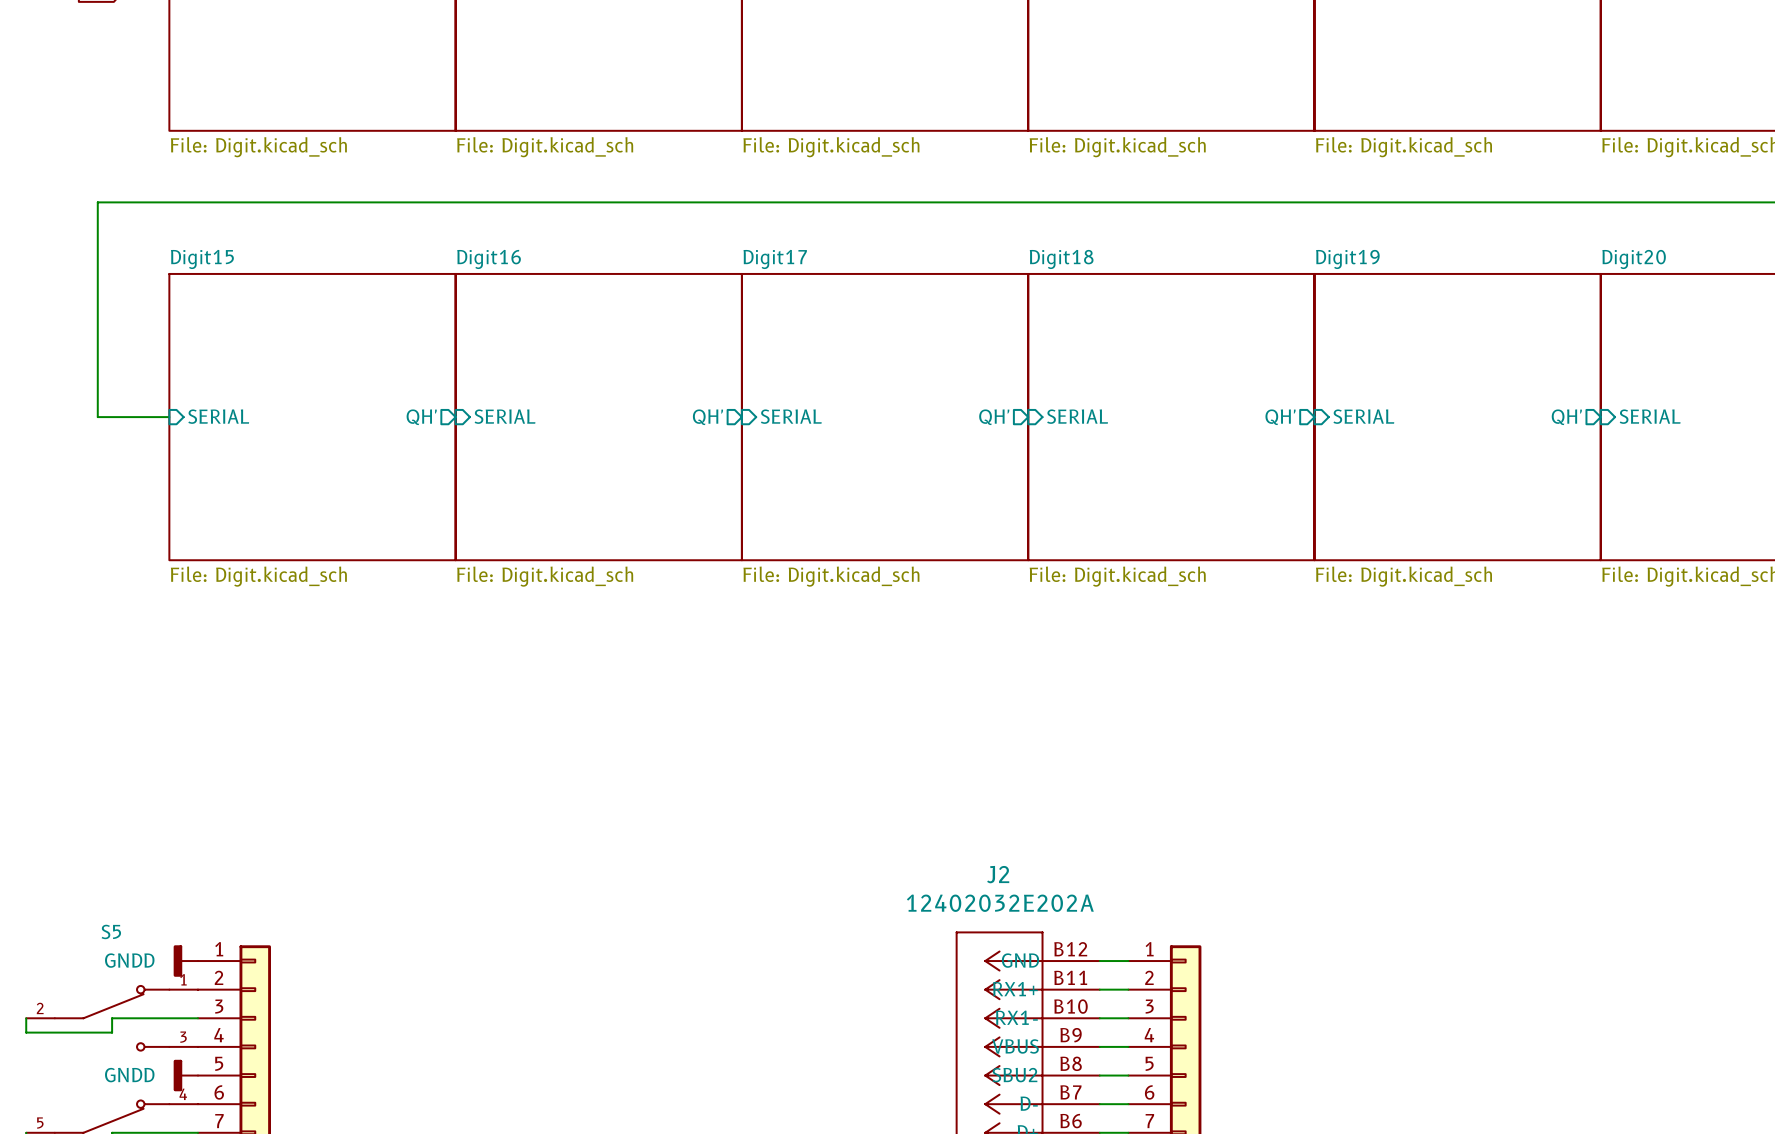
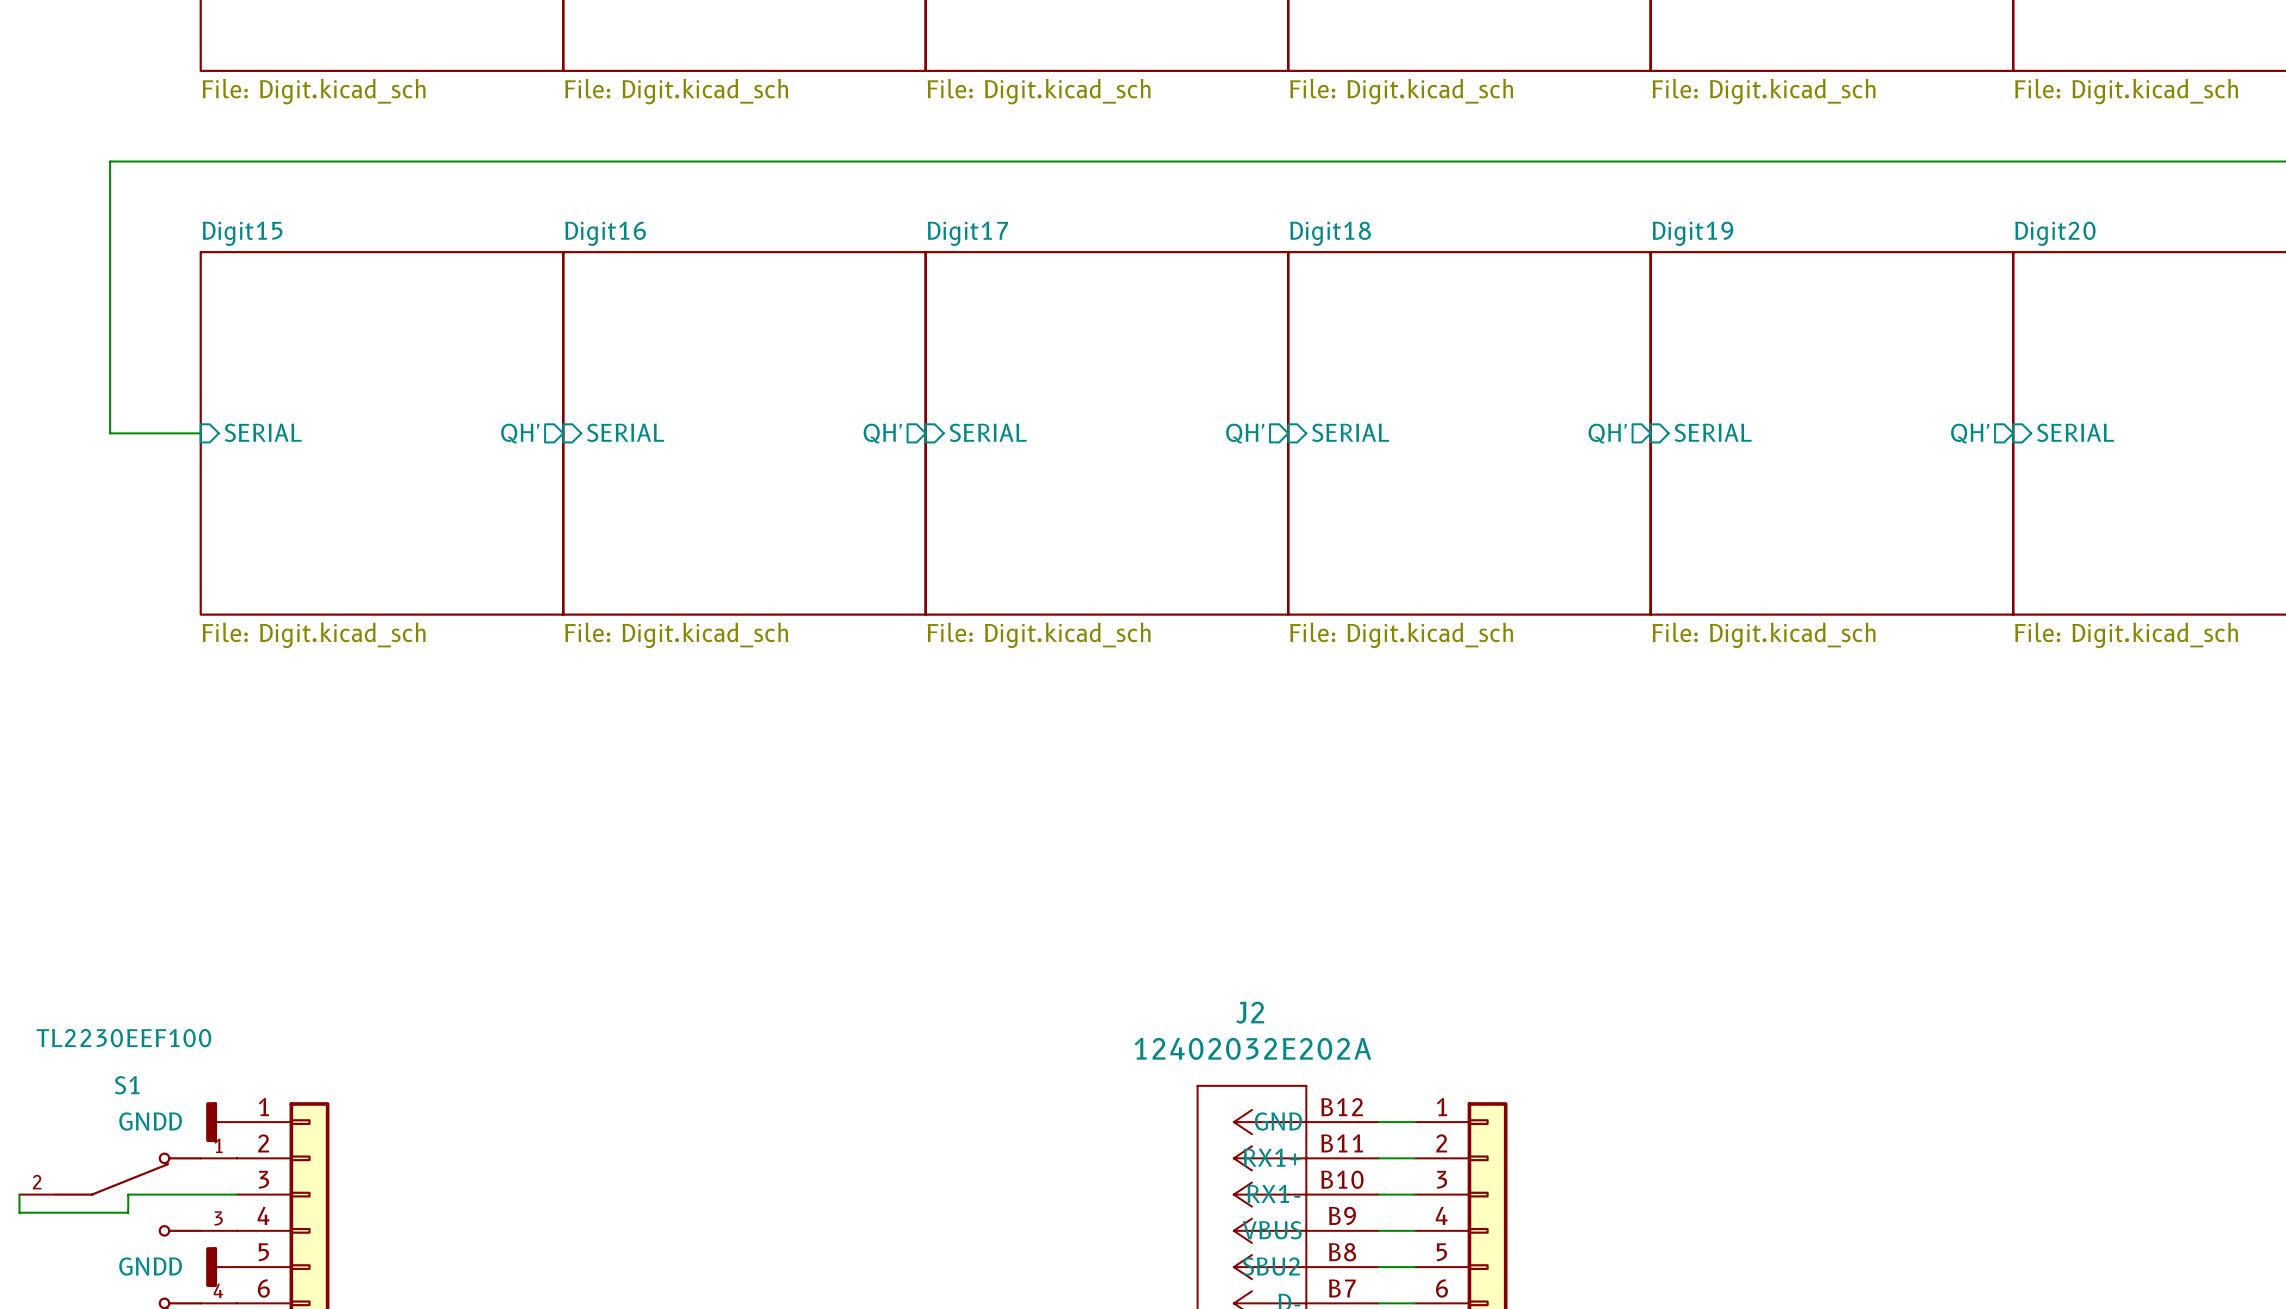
S5 value: none -> TL2230EEF100 (123, 1038)
S5 name: S5 (111, 931) -> S1 (127, 1085)

